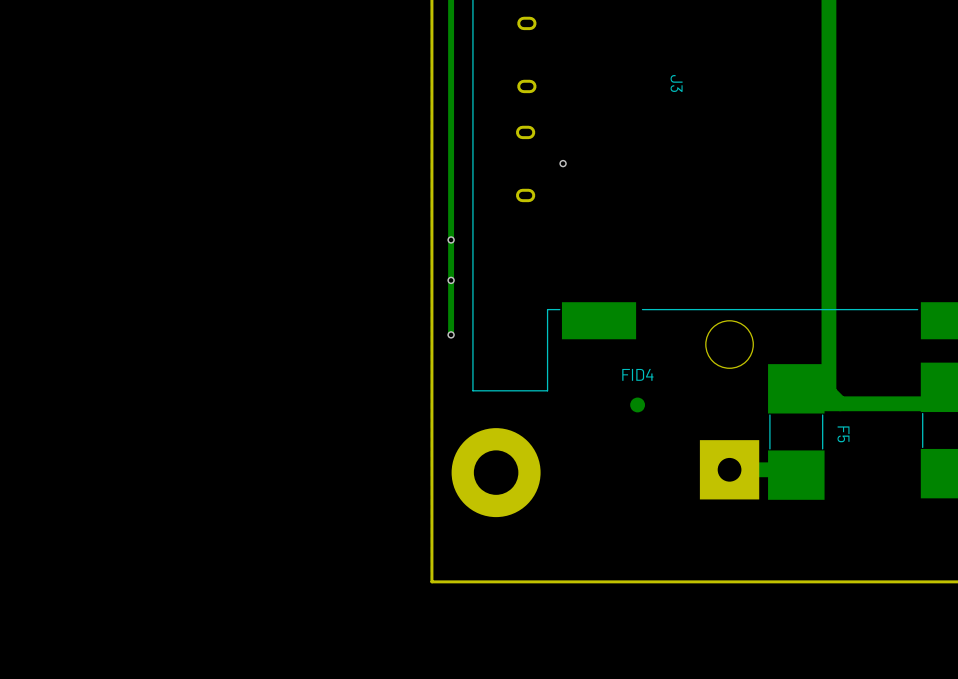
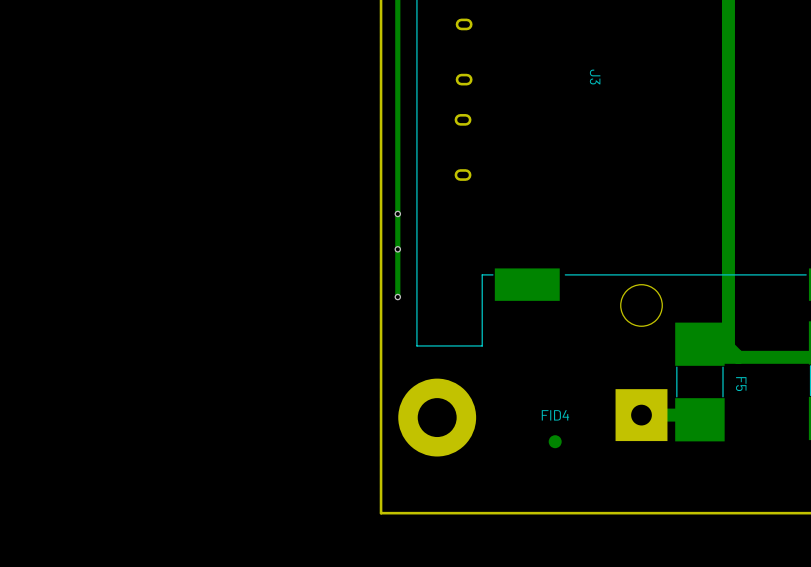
via: (563, 163) -> none
FID4 position: (637, 404) -> (555, 441)

